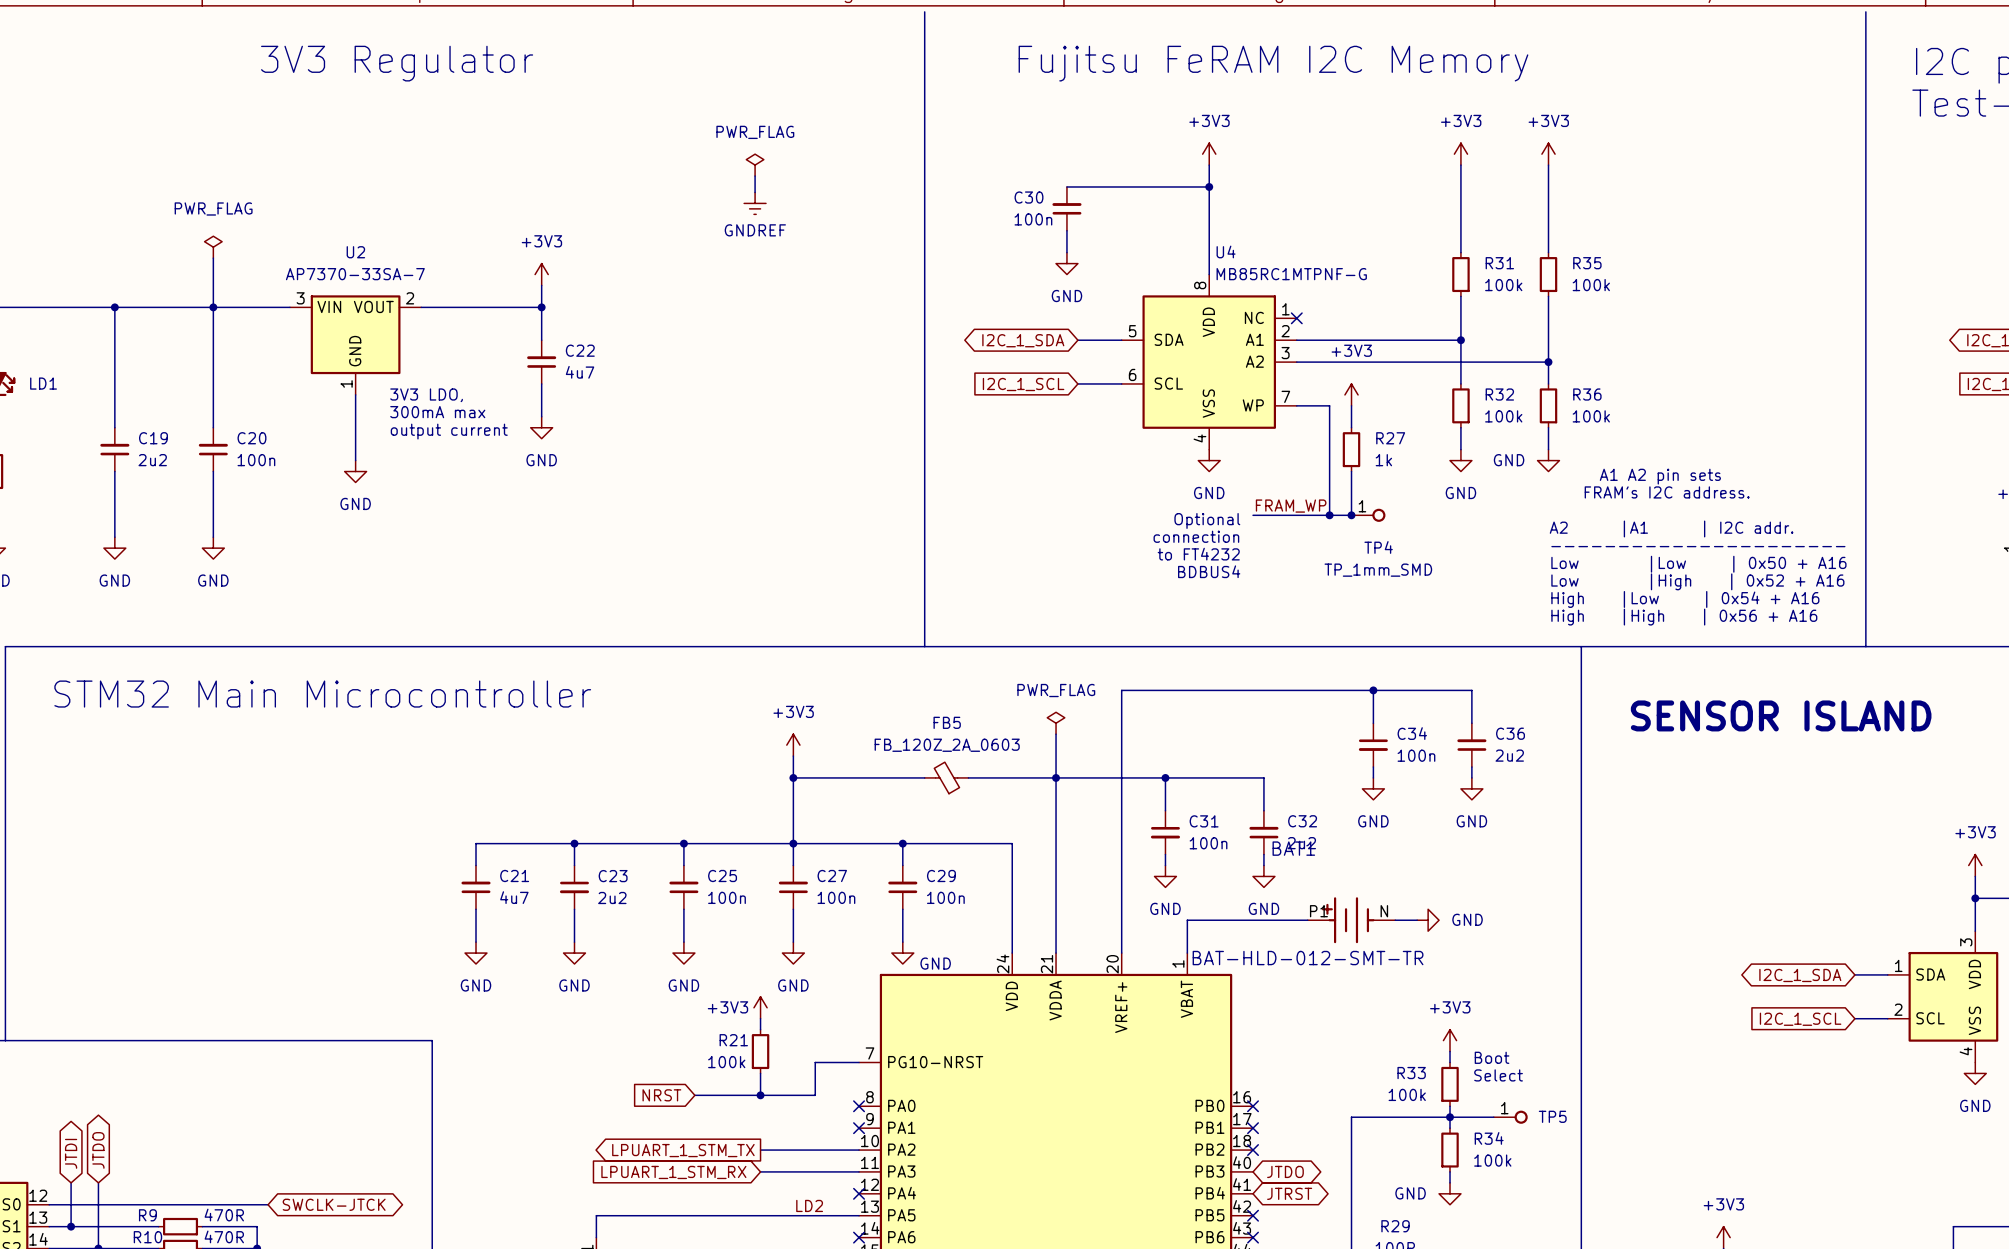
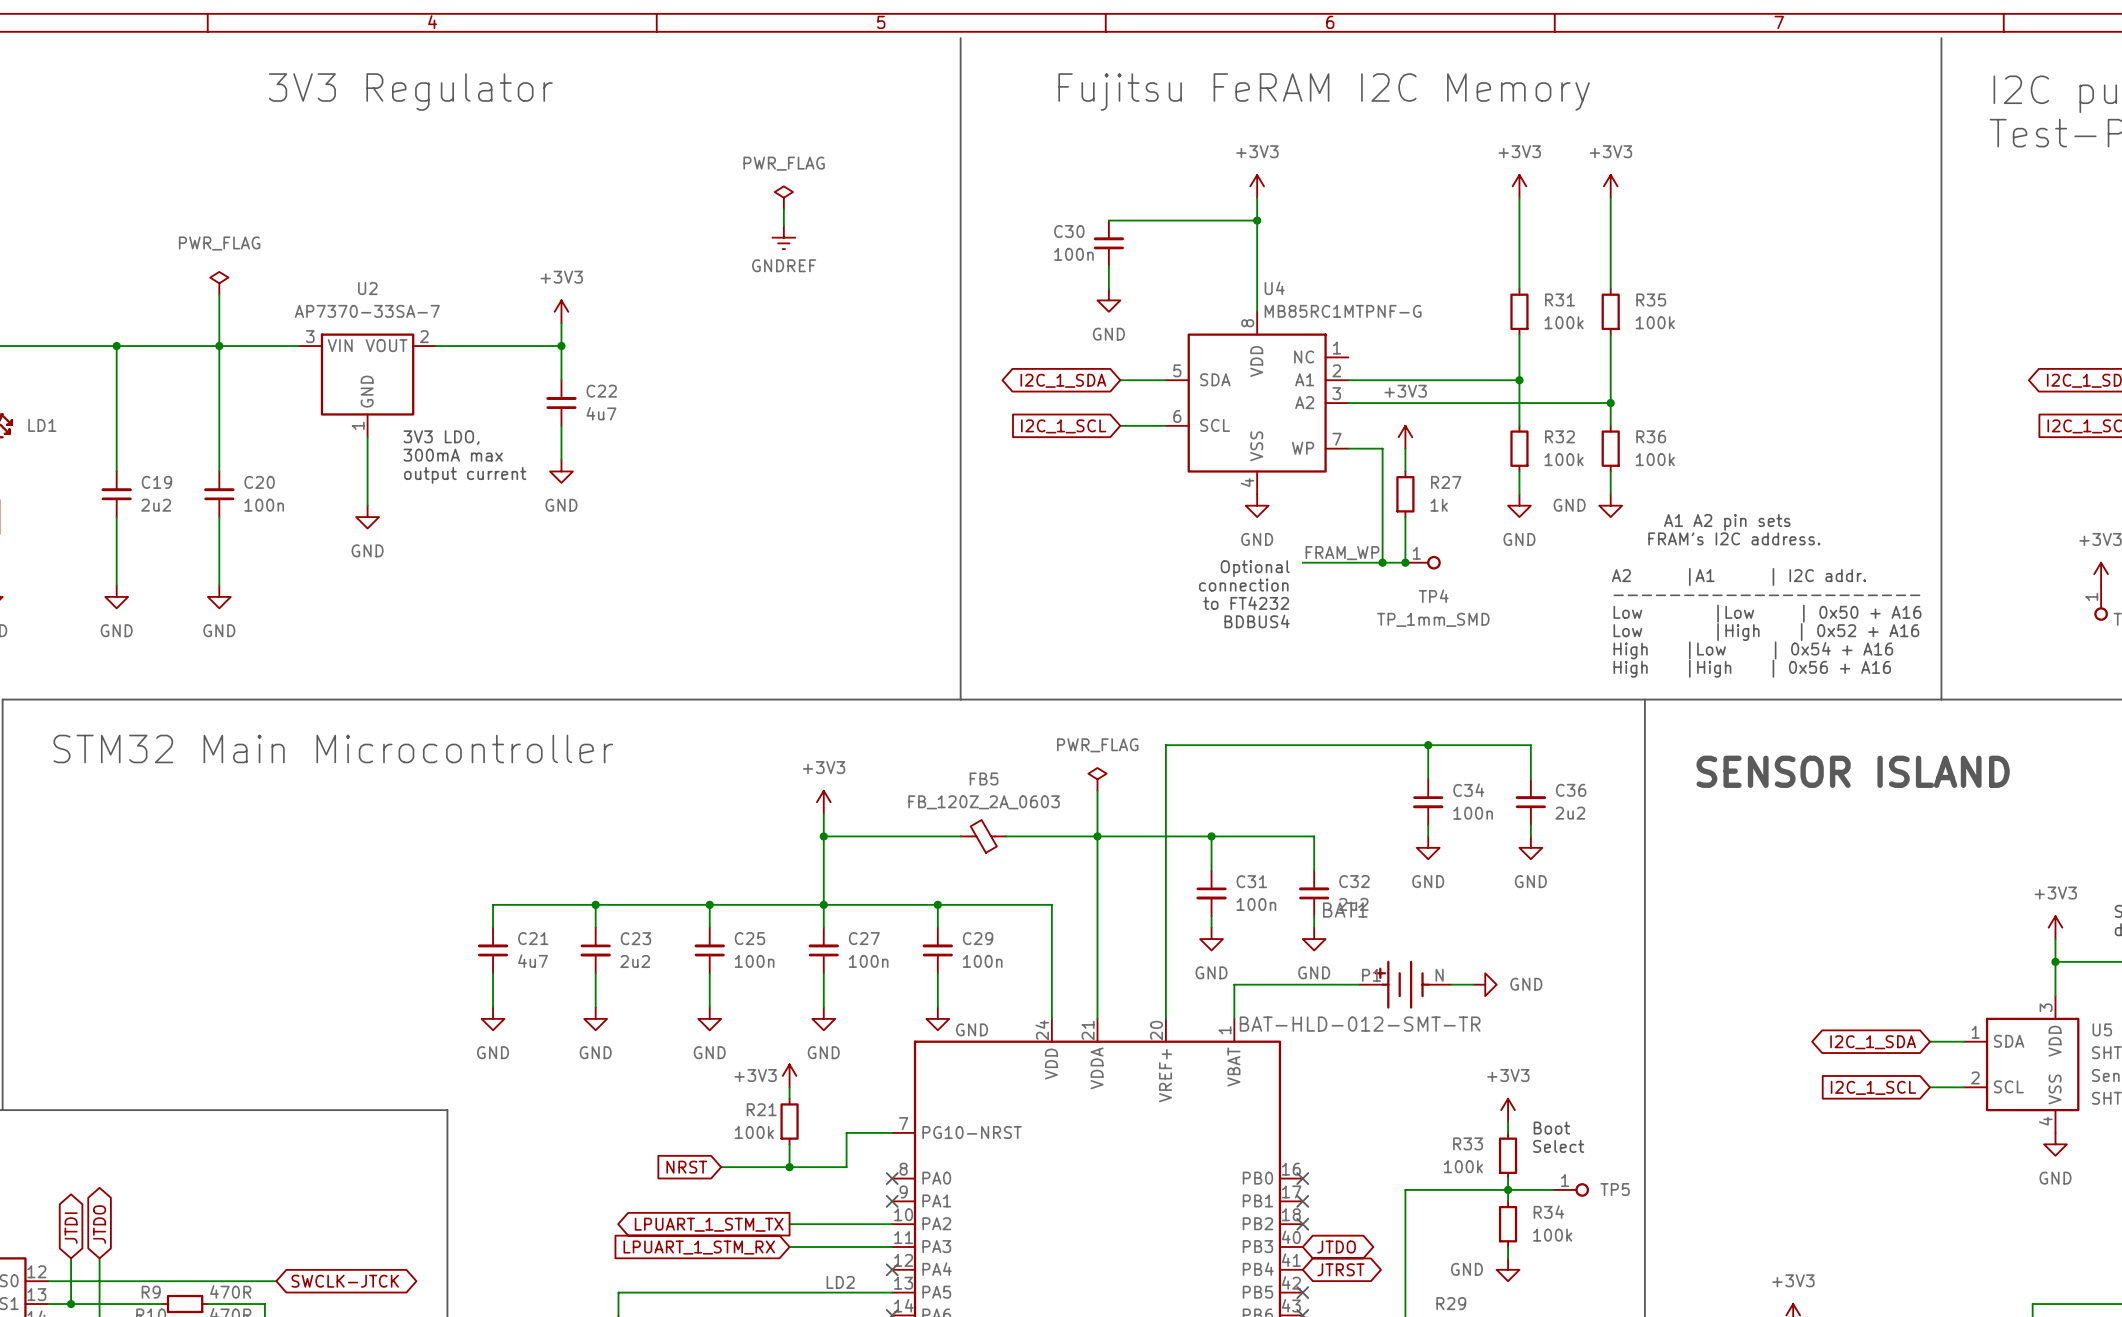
no-connect mark: (1296, 318) -> none

